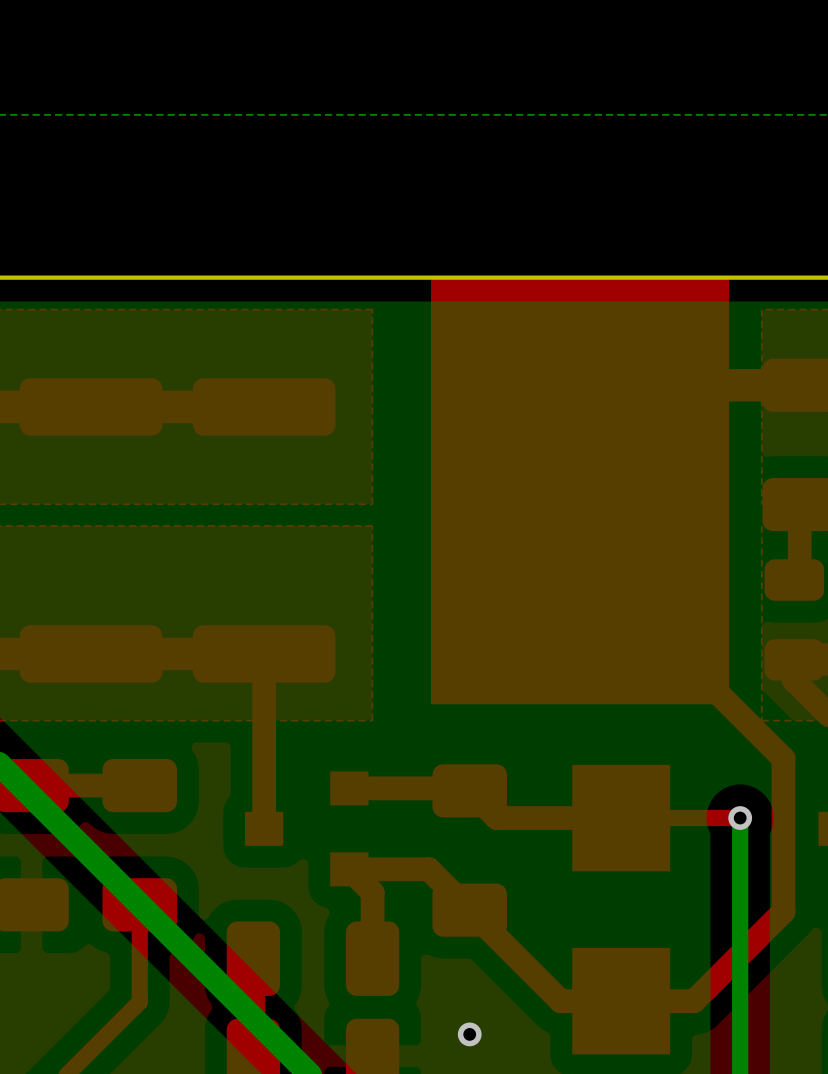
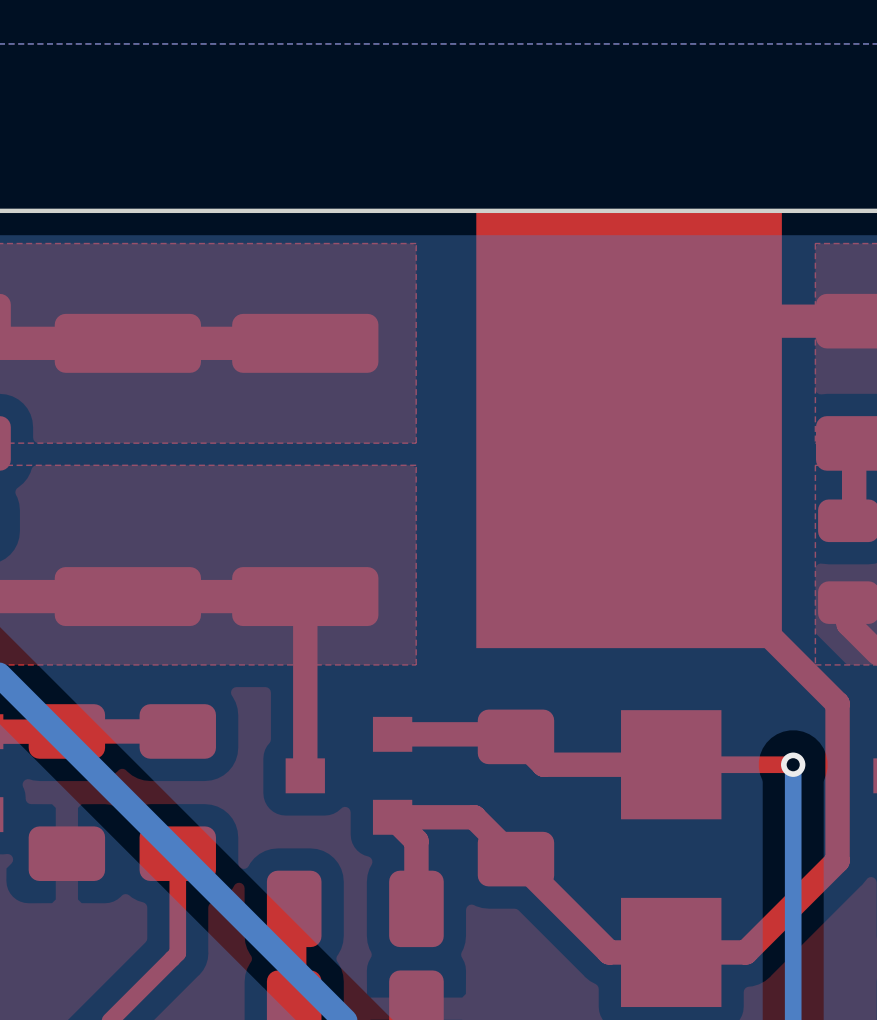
via: (469, 1034) -> none

